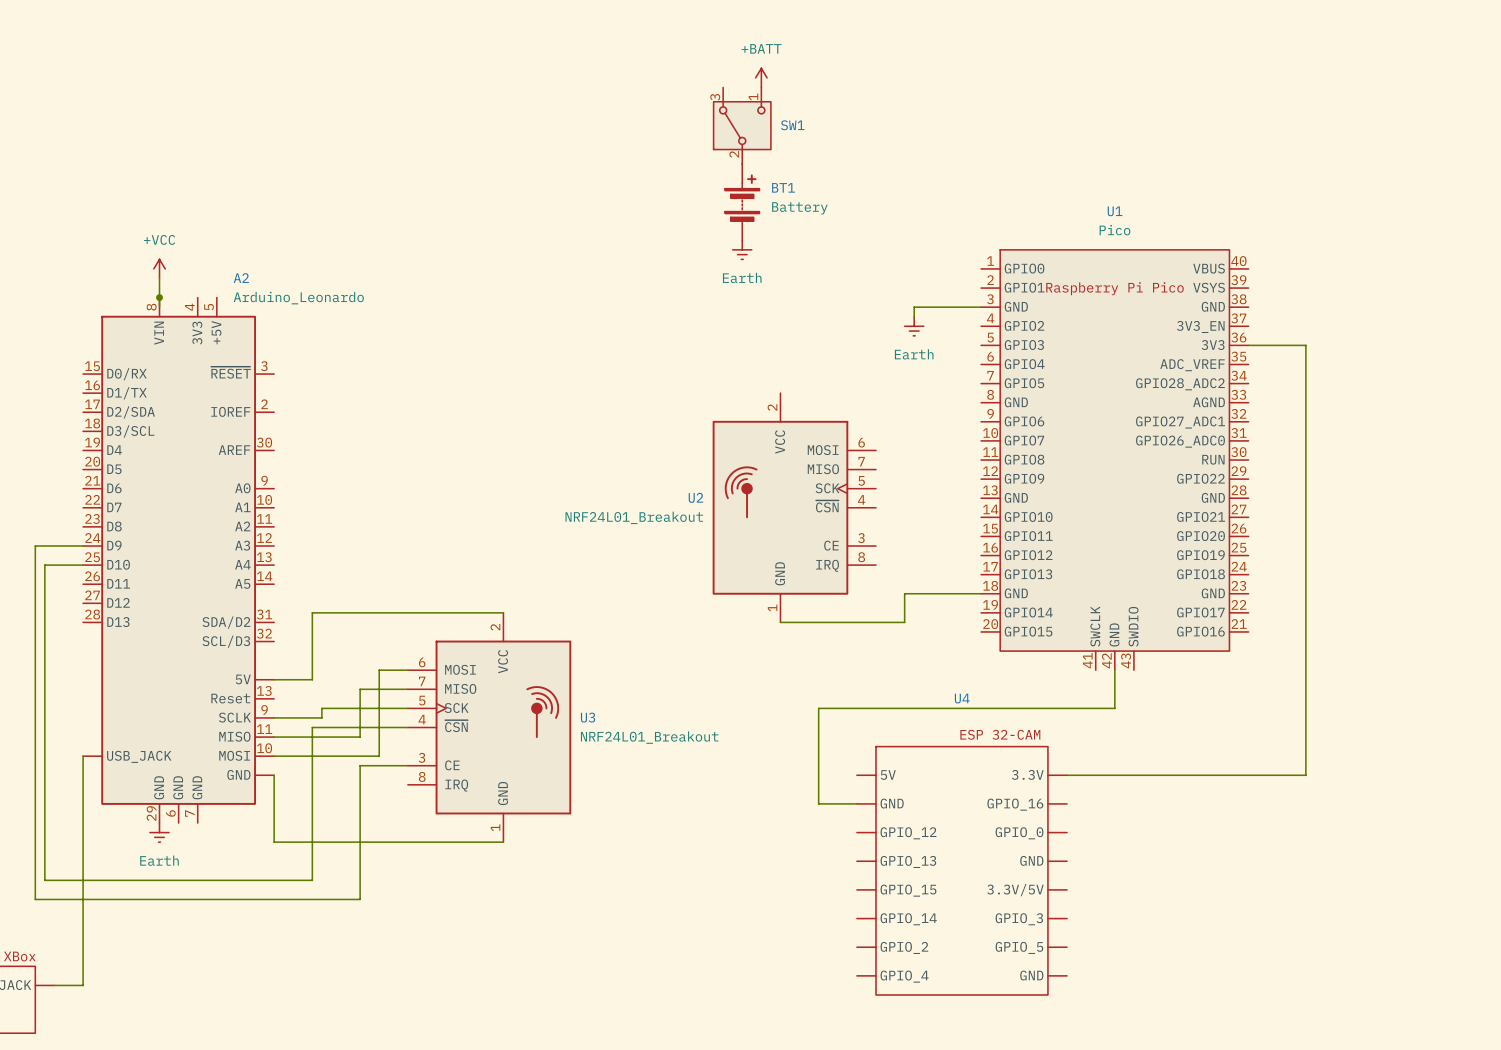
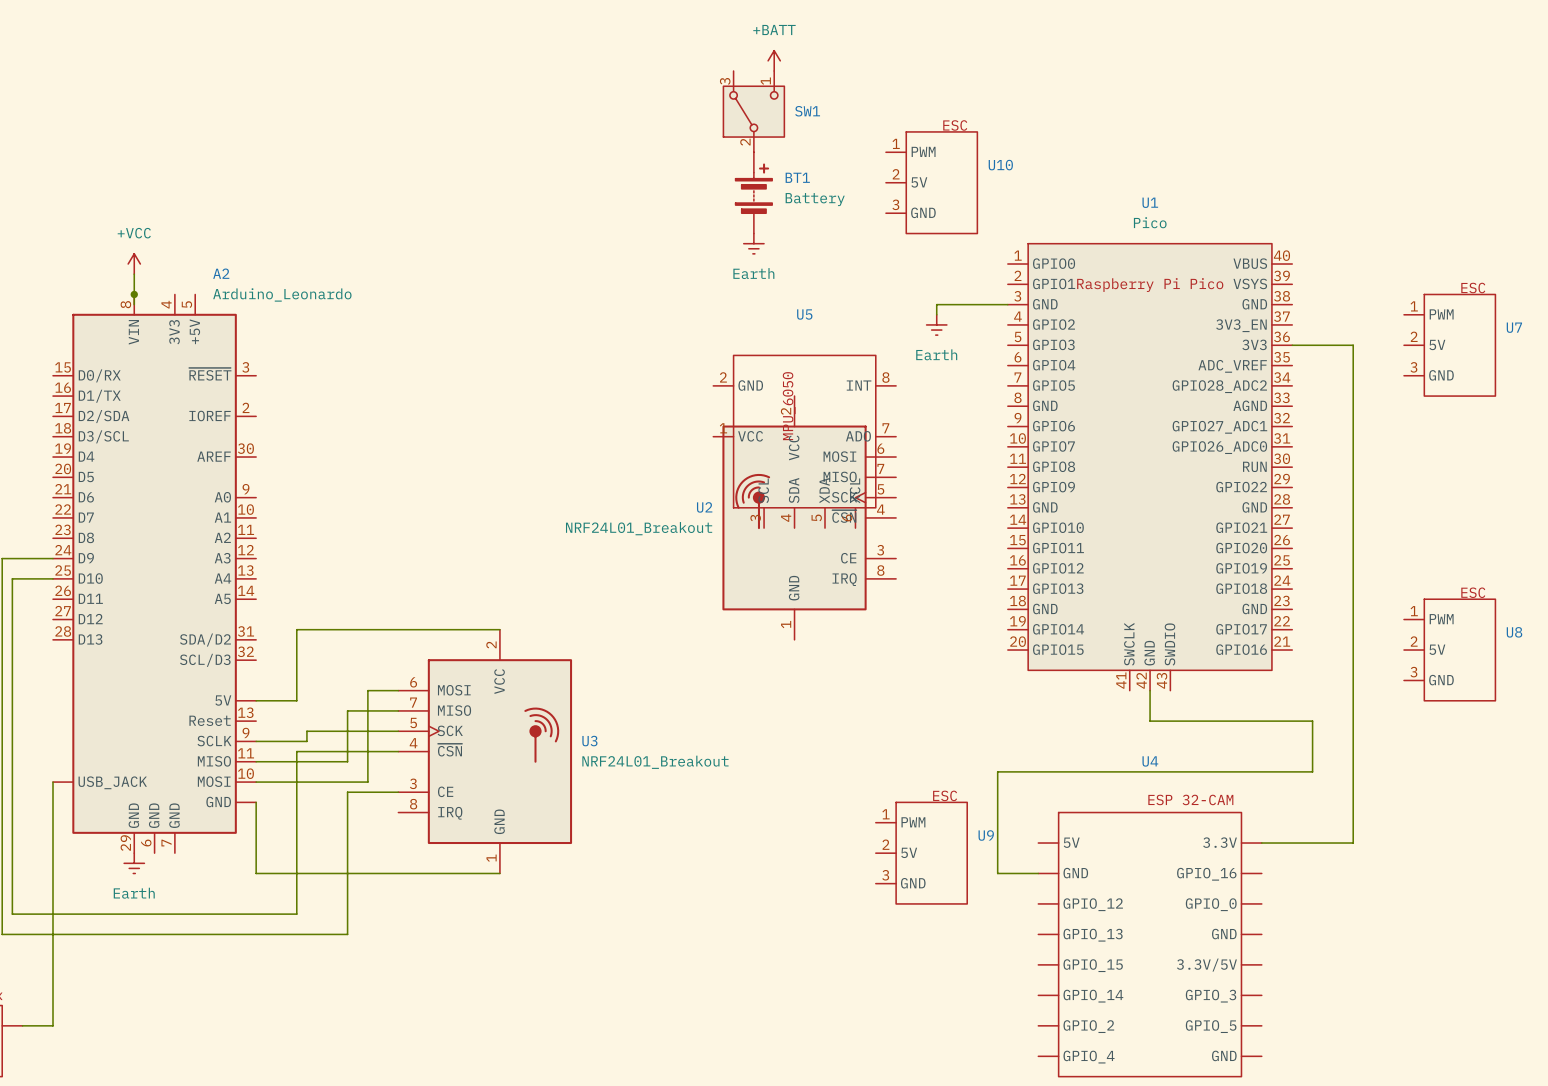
U10: none -> (931, 182)
U7: none -> (1449, 345)
U5: none -> (804, 441)
wire: (981, 593) (904, 593) (904, 622) (780, 622) -> none
U8: none -> (1449, 650)
wire: (1114, 698) (1114, 708) (818, 708) (818, 803) (856, 803) -> (1150, 721) (1312, 721) (1312, 771) (997, 771) (997, 873) (1038, 873)
wire: (1067, 775) (1305, 775) -> (1261, 843) (1353, 843) (1353, 802)
U9: none -> (921, 853)
U4 position: (961, 870) -> (1150, 944)

